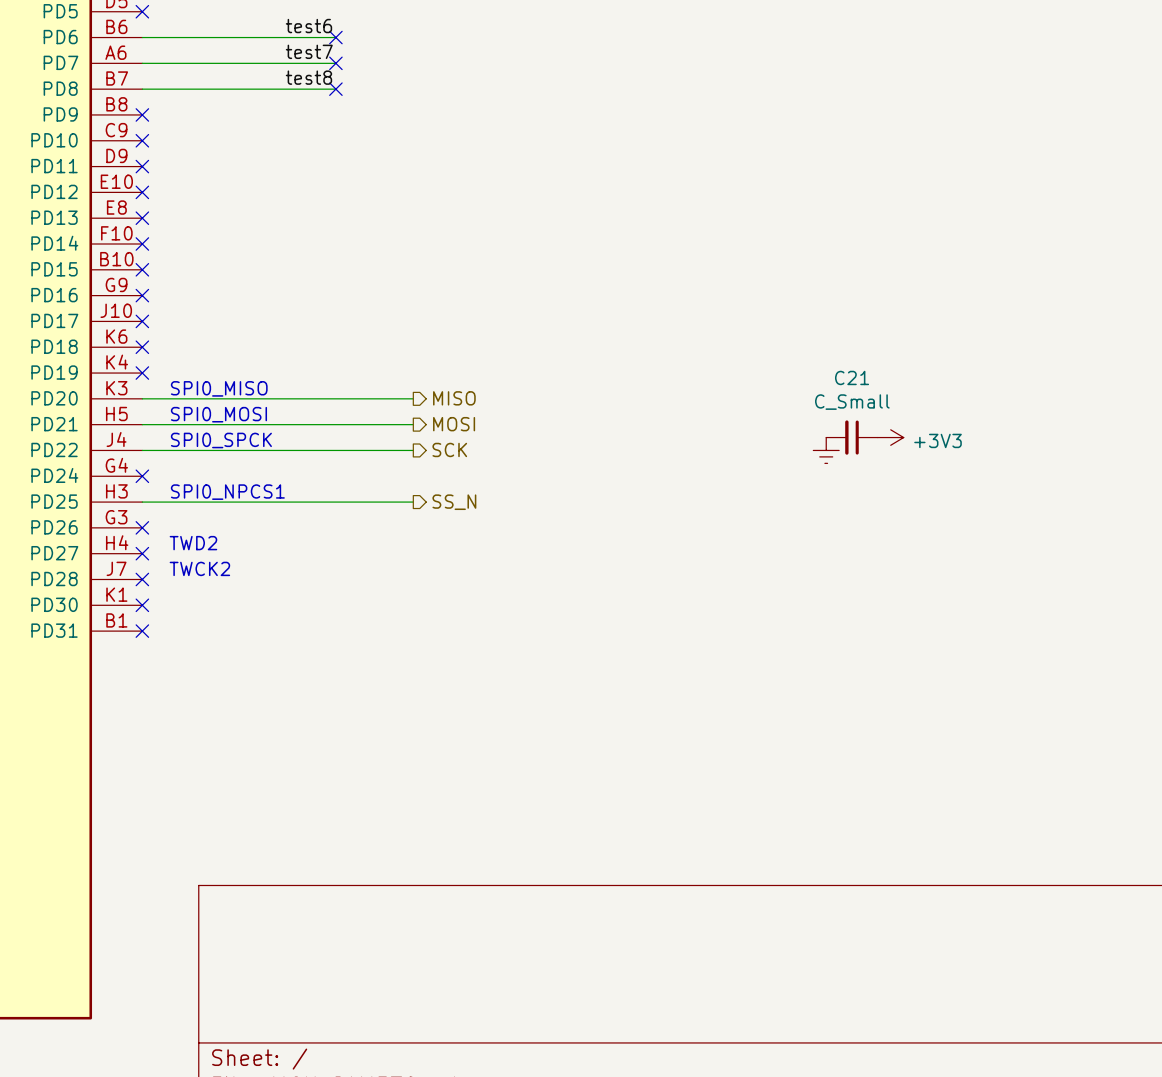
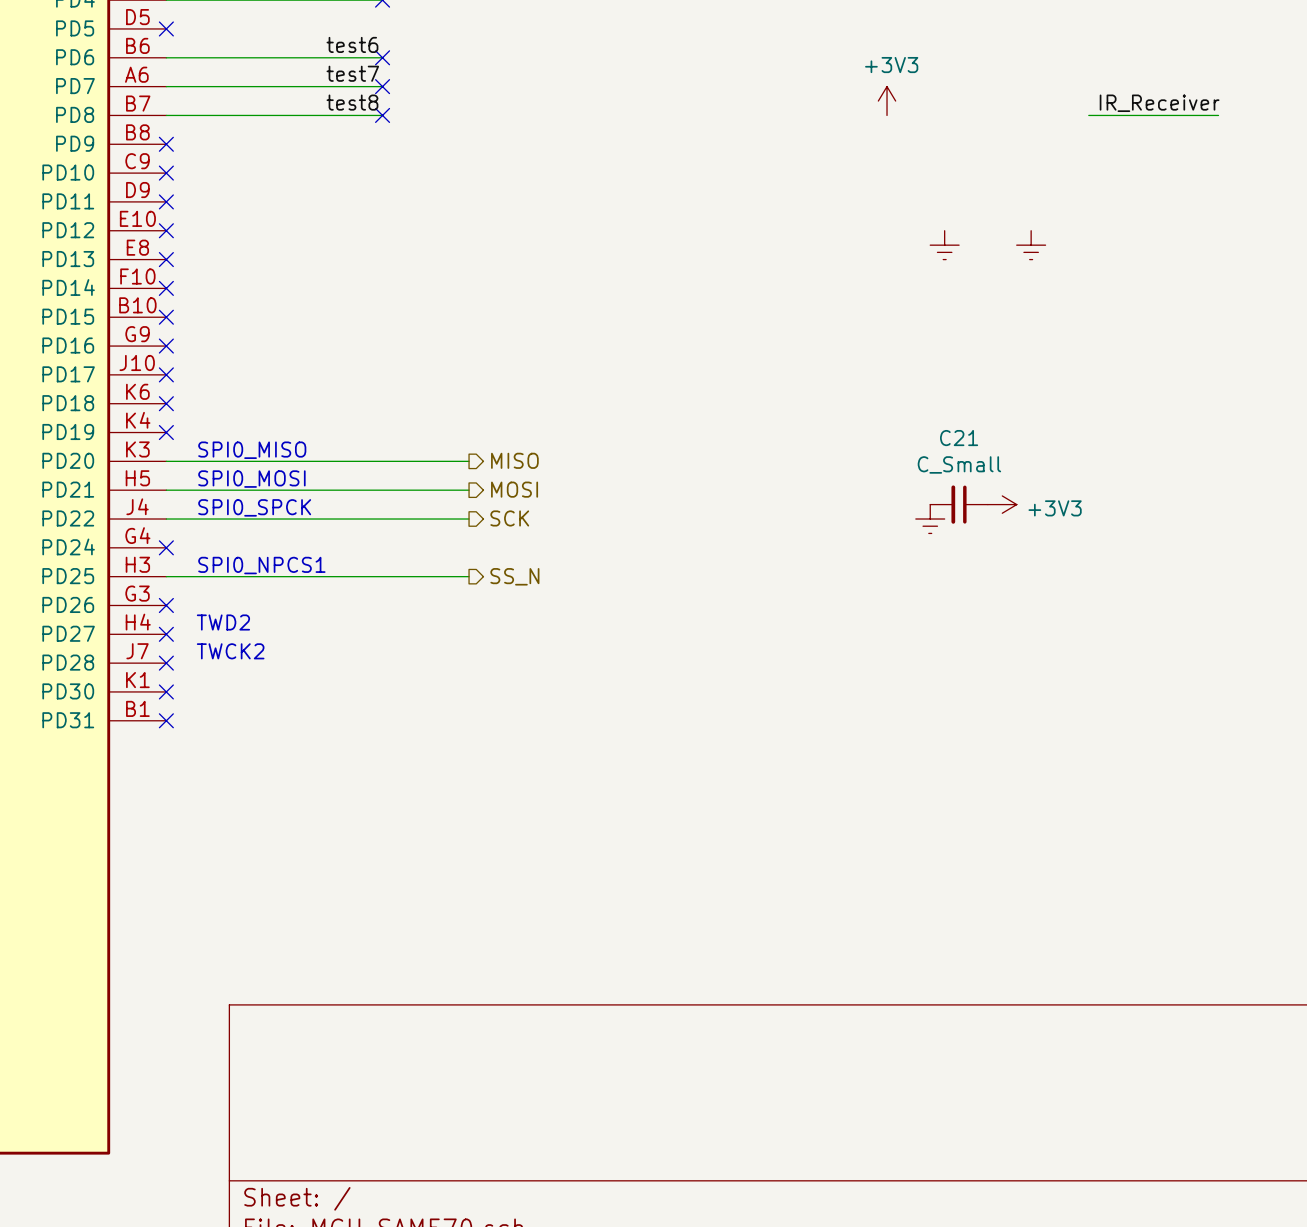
power symbol: none -> +3V3 (887, 101)
label: none -> IR_Receiver (1159, 103)
wire: none -> (1088, 115) (1218, 115)
power symbol: none -> (944, 245)
power symbol: none -> (1031, 245)

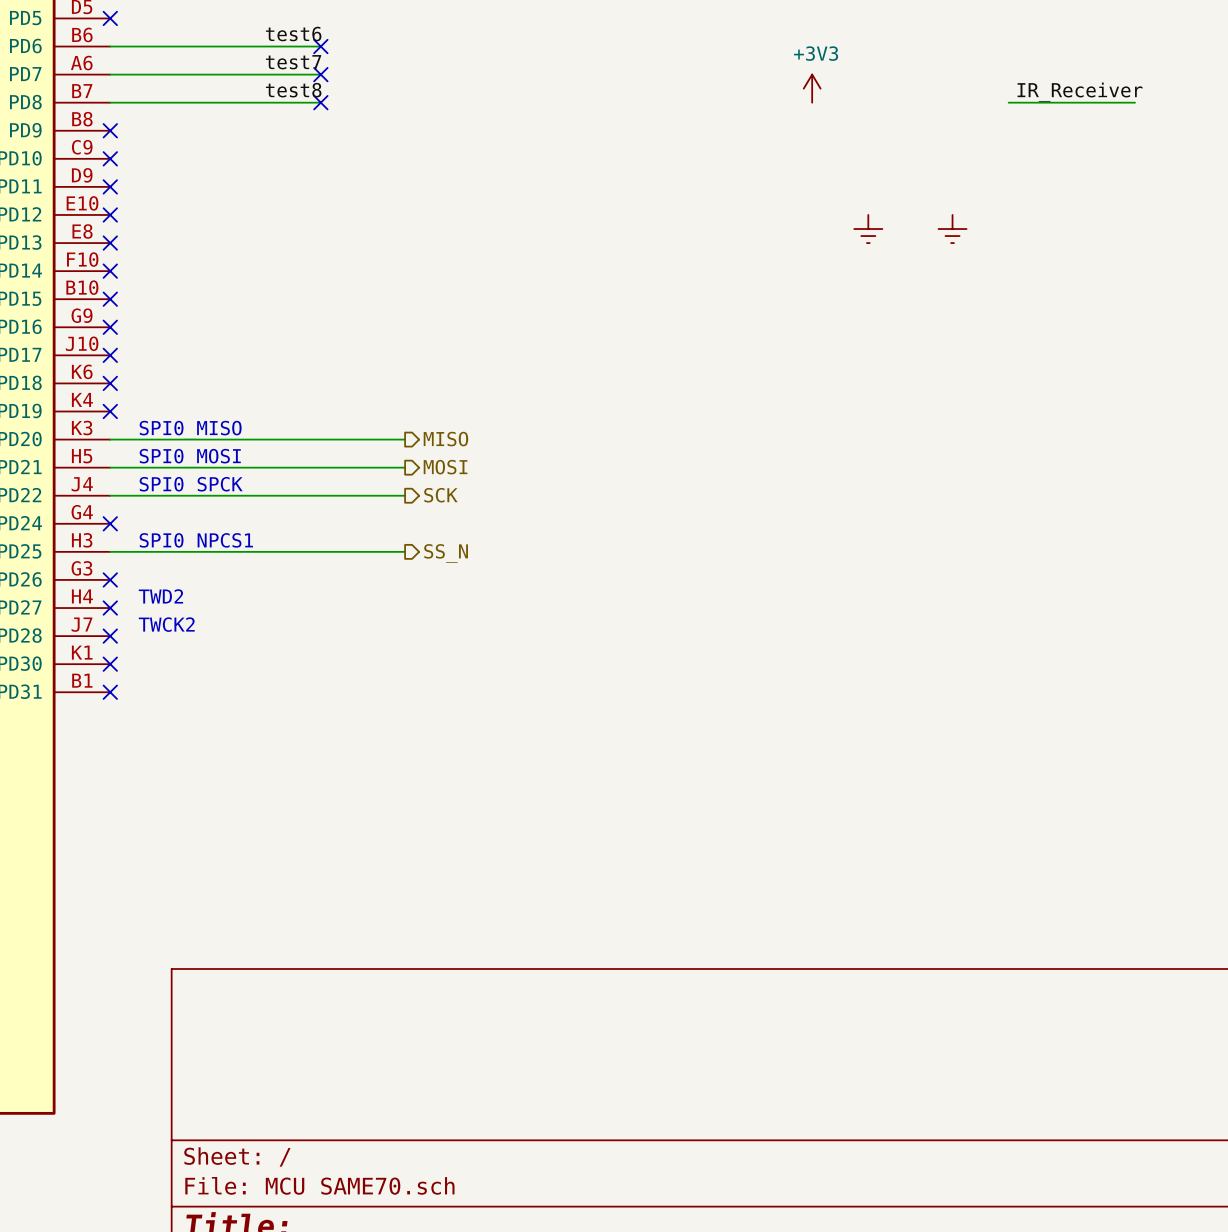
C21: C_Small (959, 504) -> none
power symbol: +3V3 (1002, 504) -> none
power symbol: (930, 519) -> none

